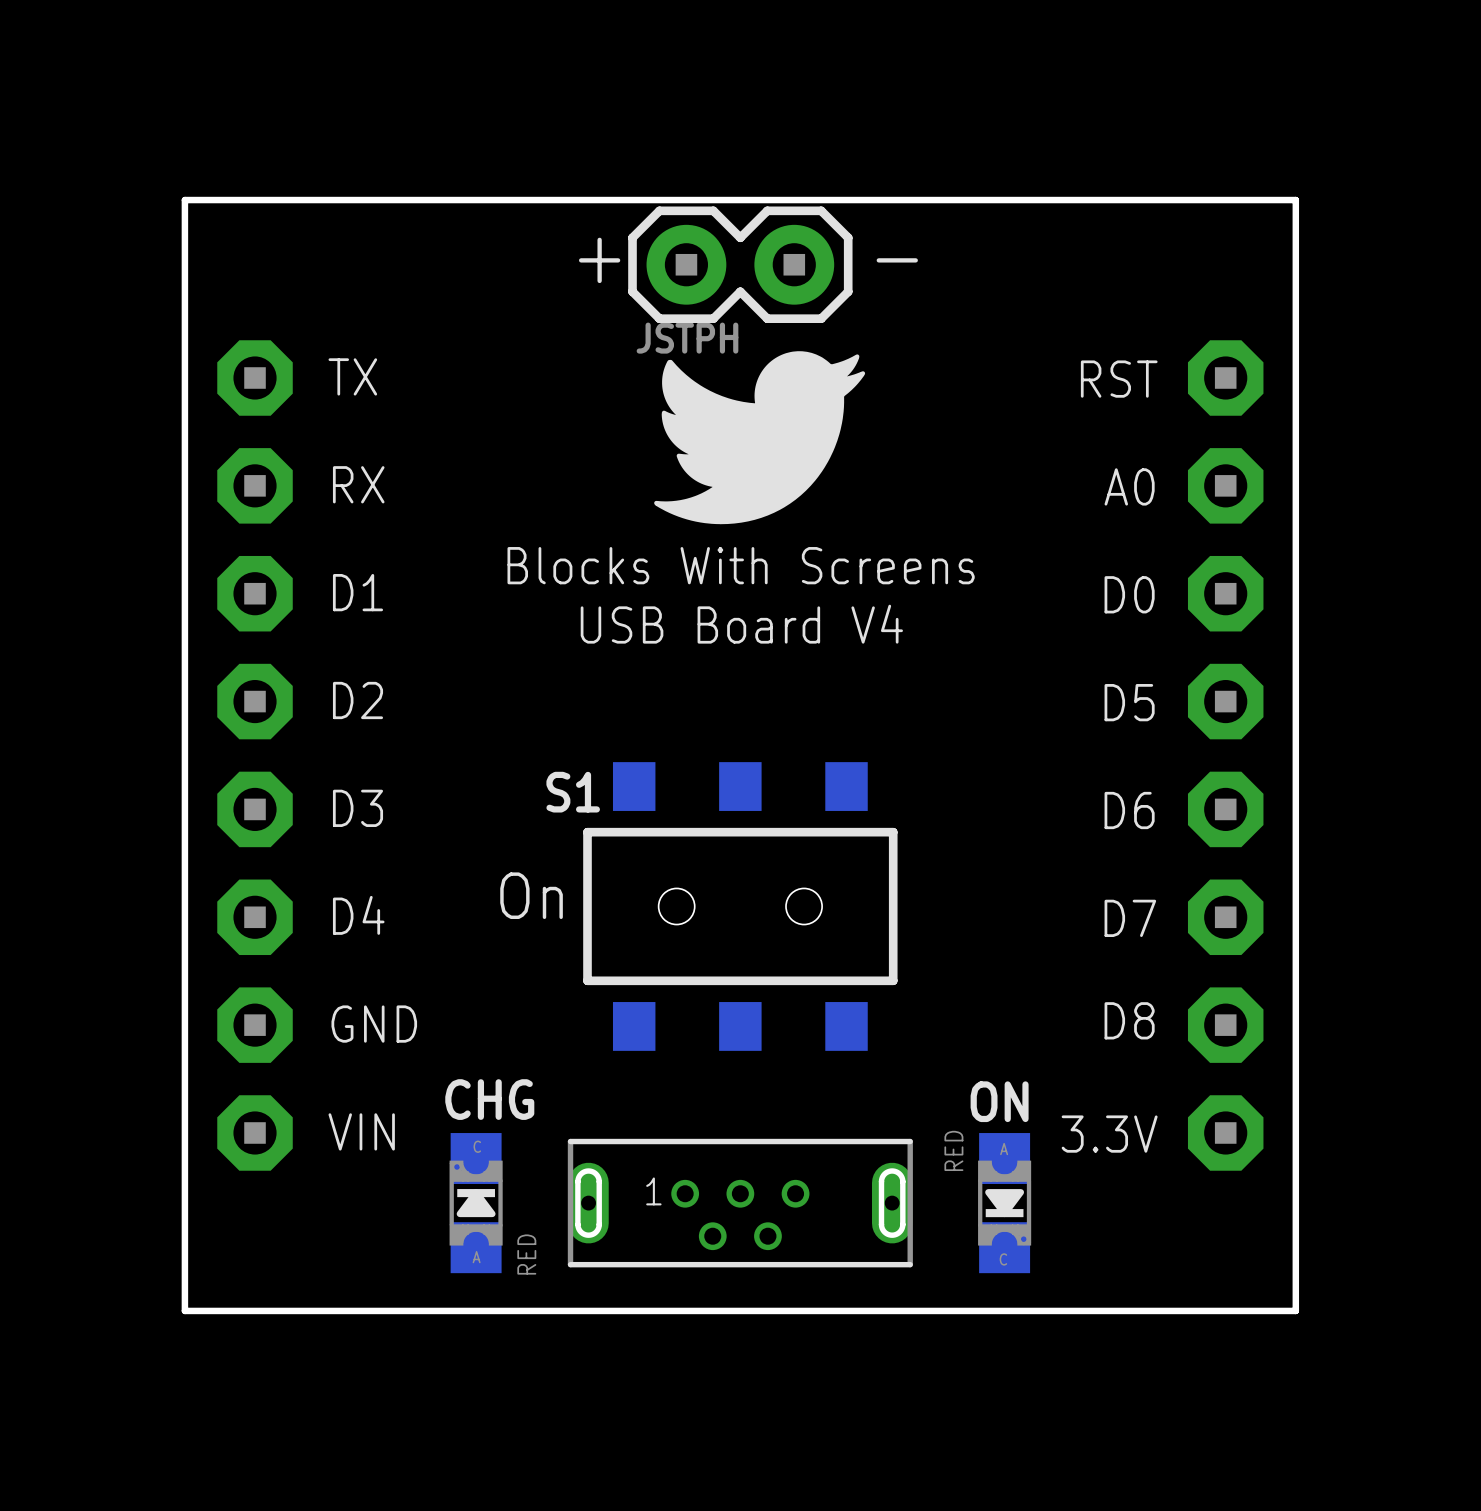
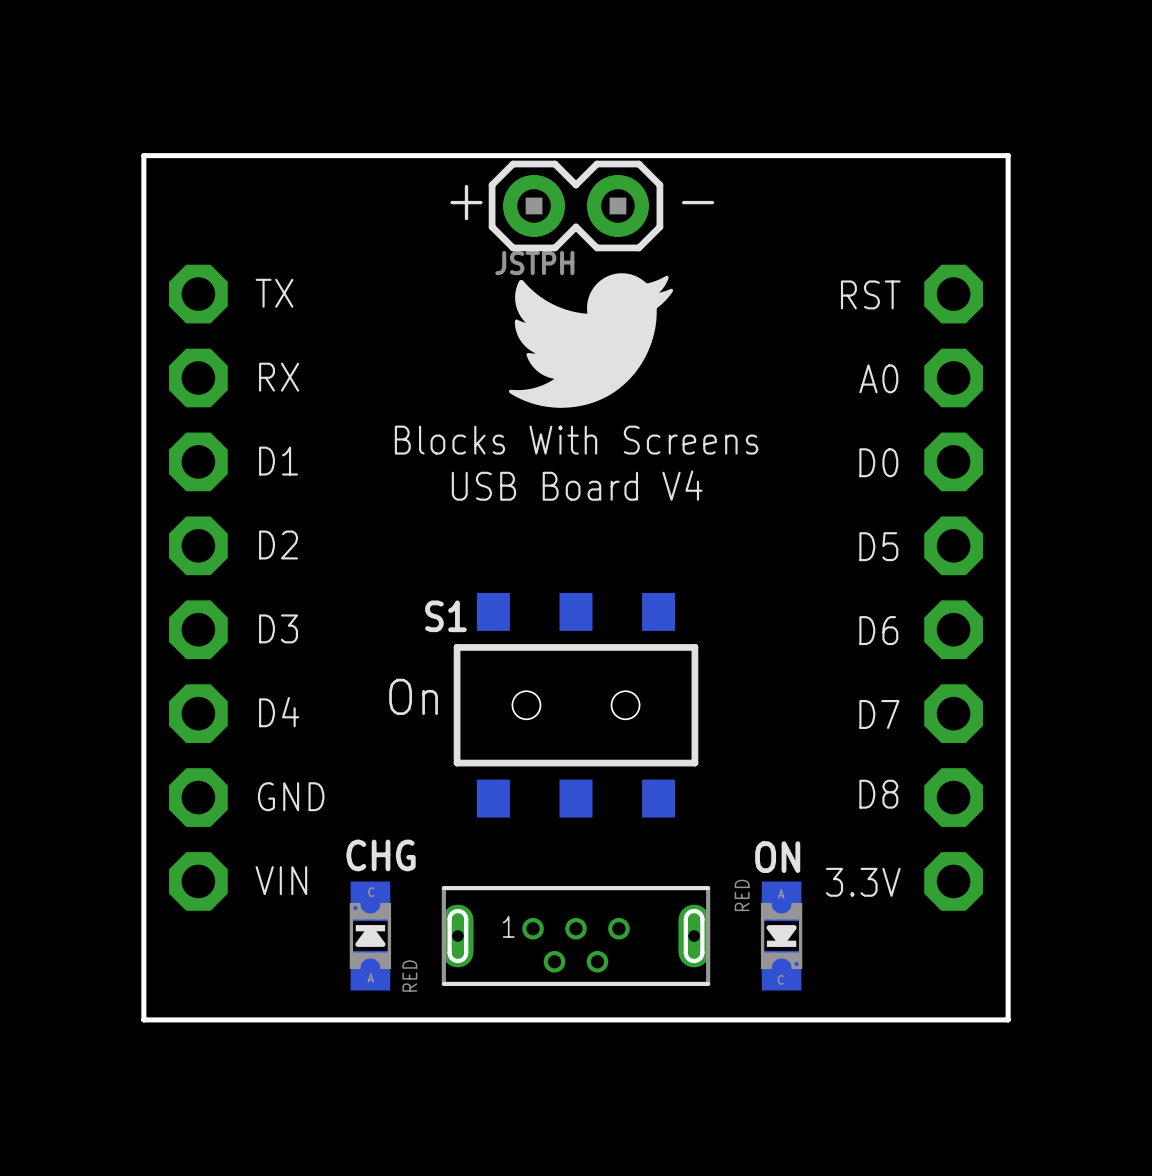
part side: bottom (255, 755) -> top (198, 587)
part side: bottom (1225, 755) -> top (953, 587)

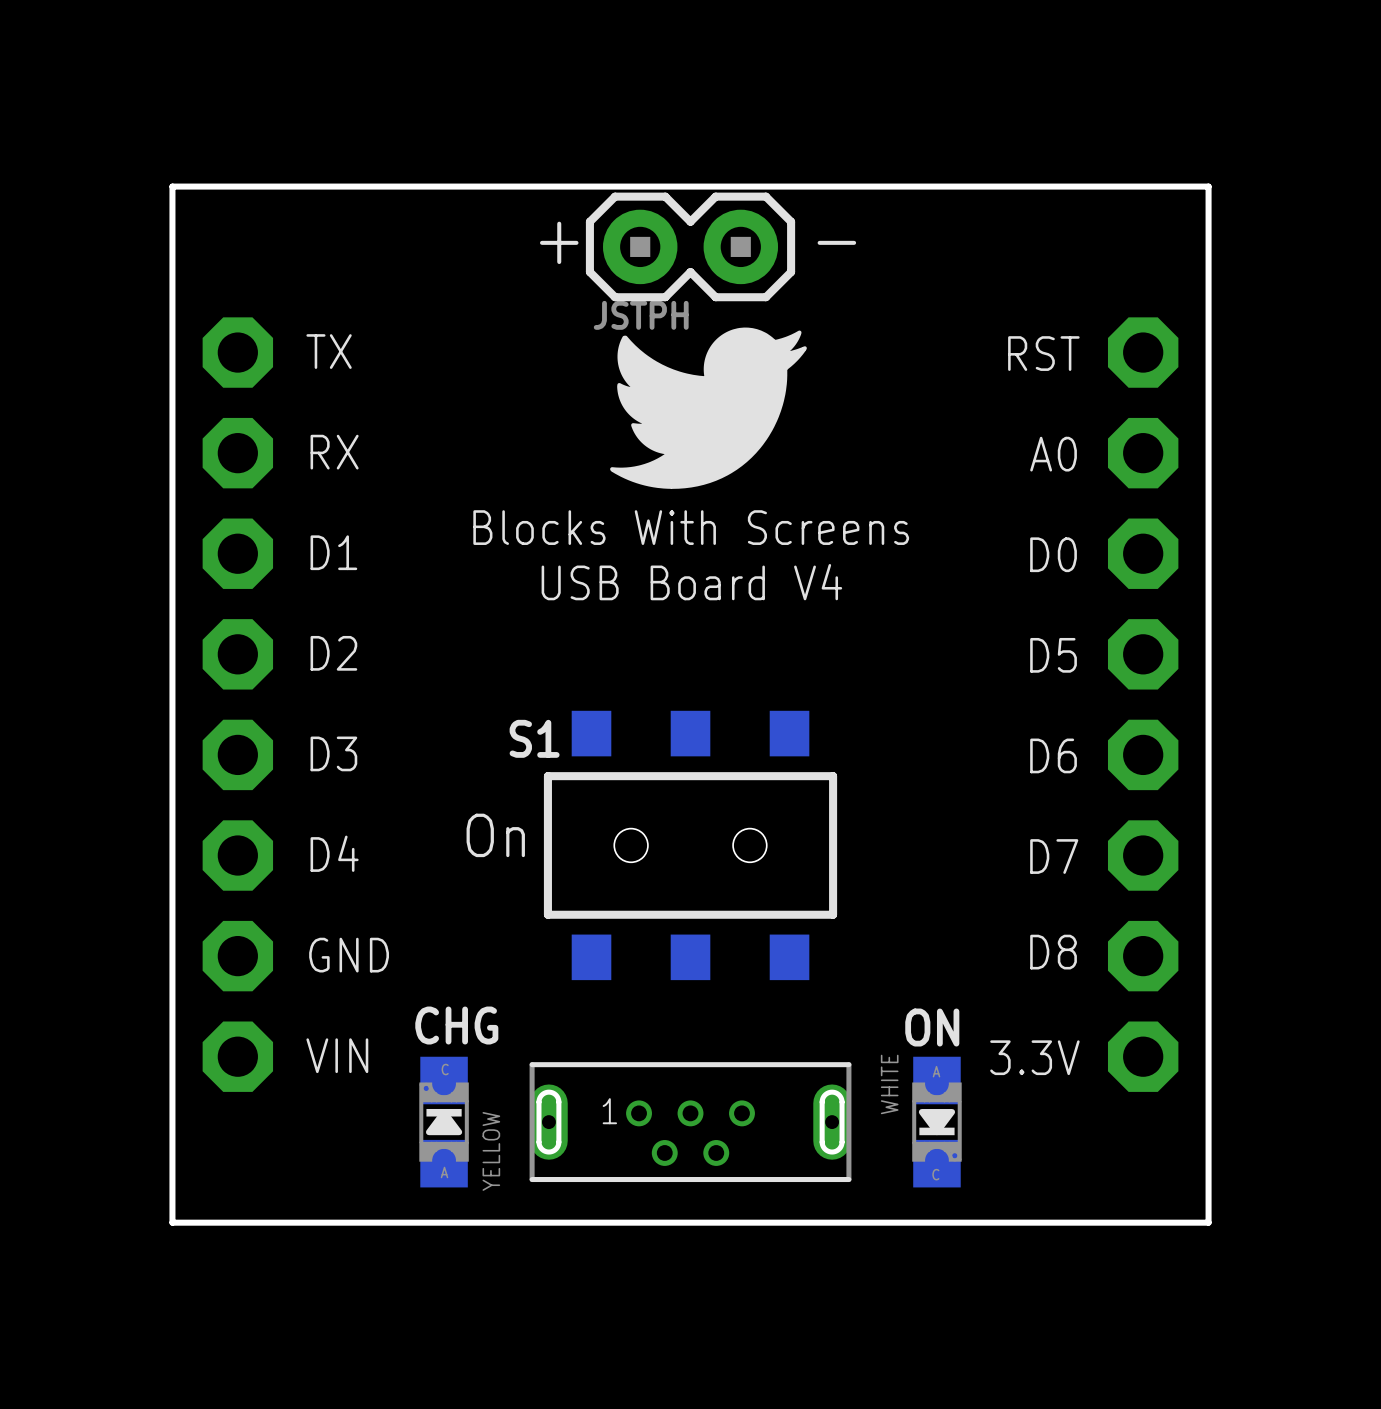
ON value: RED (742, 895) -> WHITE (889, 1084)
CHG value: RED (409, 976) -> YELLOW (491, 1151)

